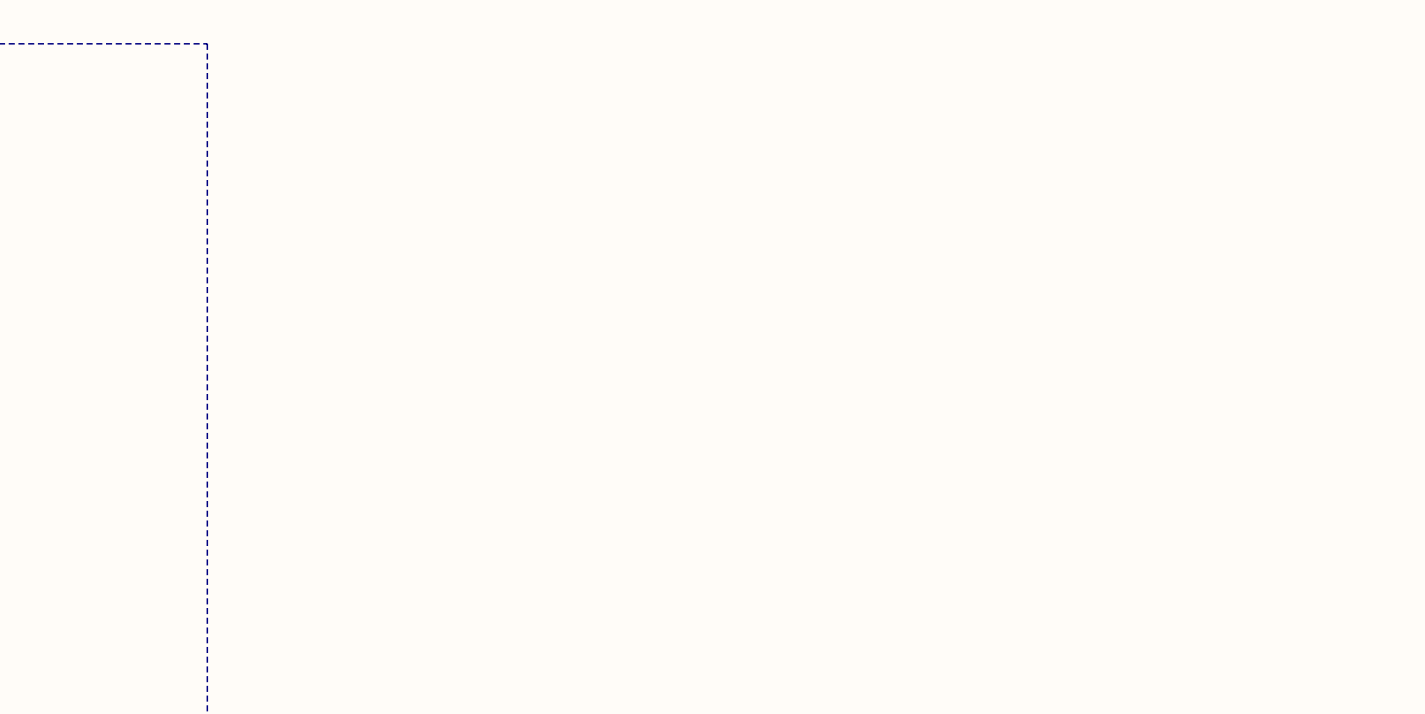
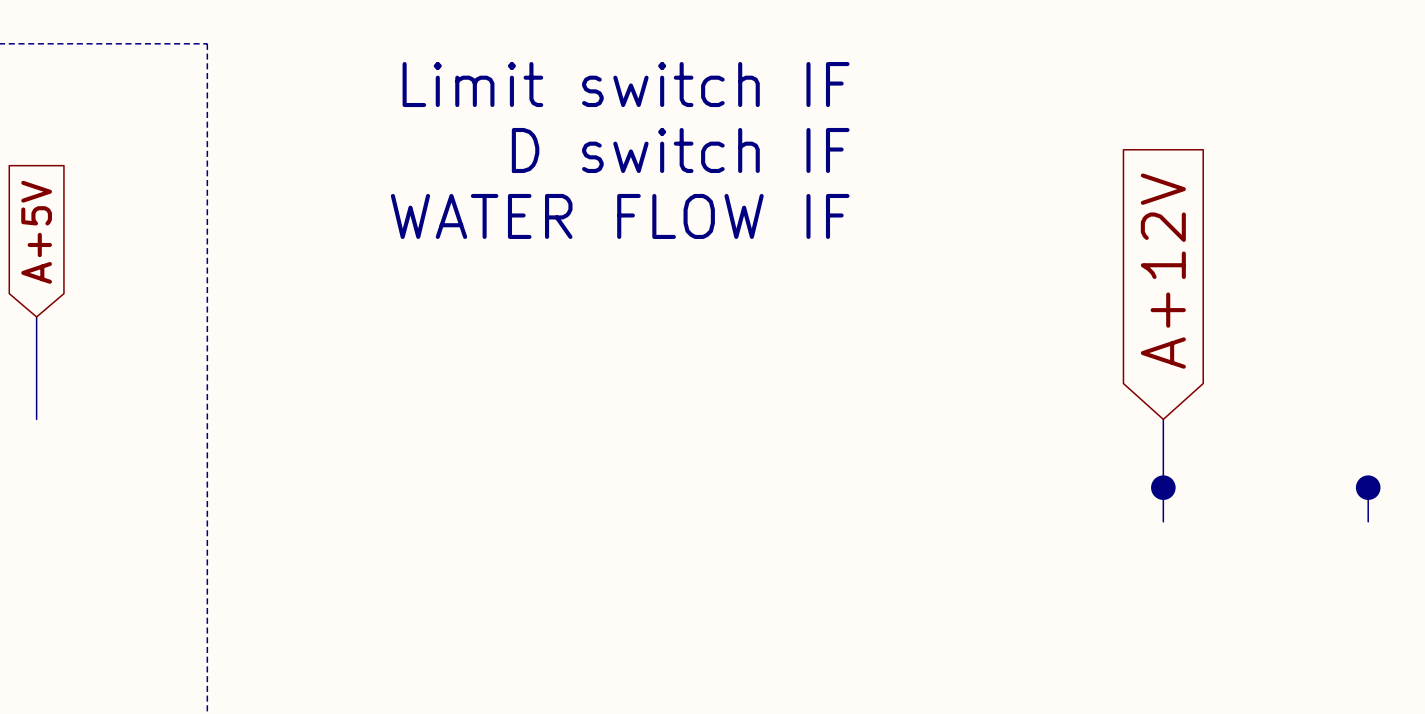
text: none -> Limit switch IF (626, 84)
text: none -> D switch IF (680, 150)
text: none -> WATER FLOW IF (620, 216)
global label: none -> A+5V (36, 232)
global label: none -> A+12V (1163, 271)
wire: none -> (36, 316) (36, 419)
wire: none -> (1163, 419) (1163, 521)
junction: none -> (1163, 487)
wire: none -> (1368, 487) (1368, 521)
junction: none -> (1368, 487)

